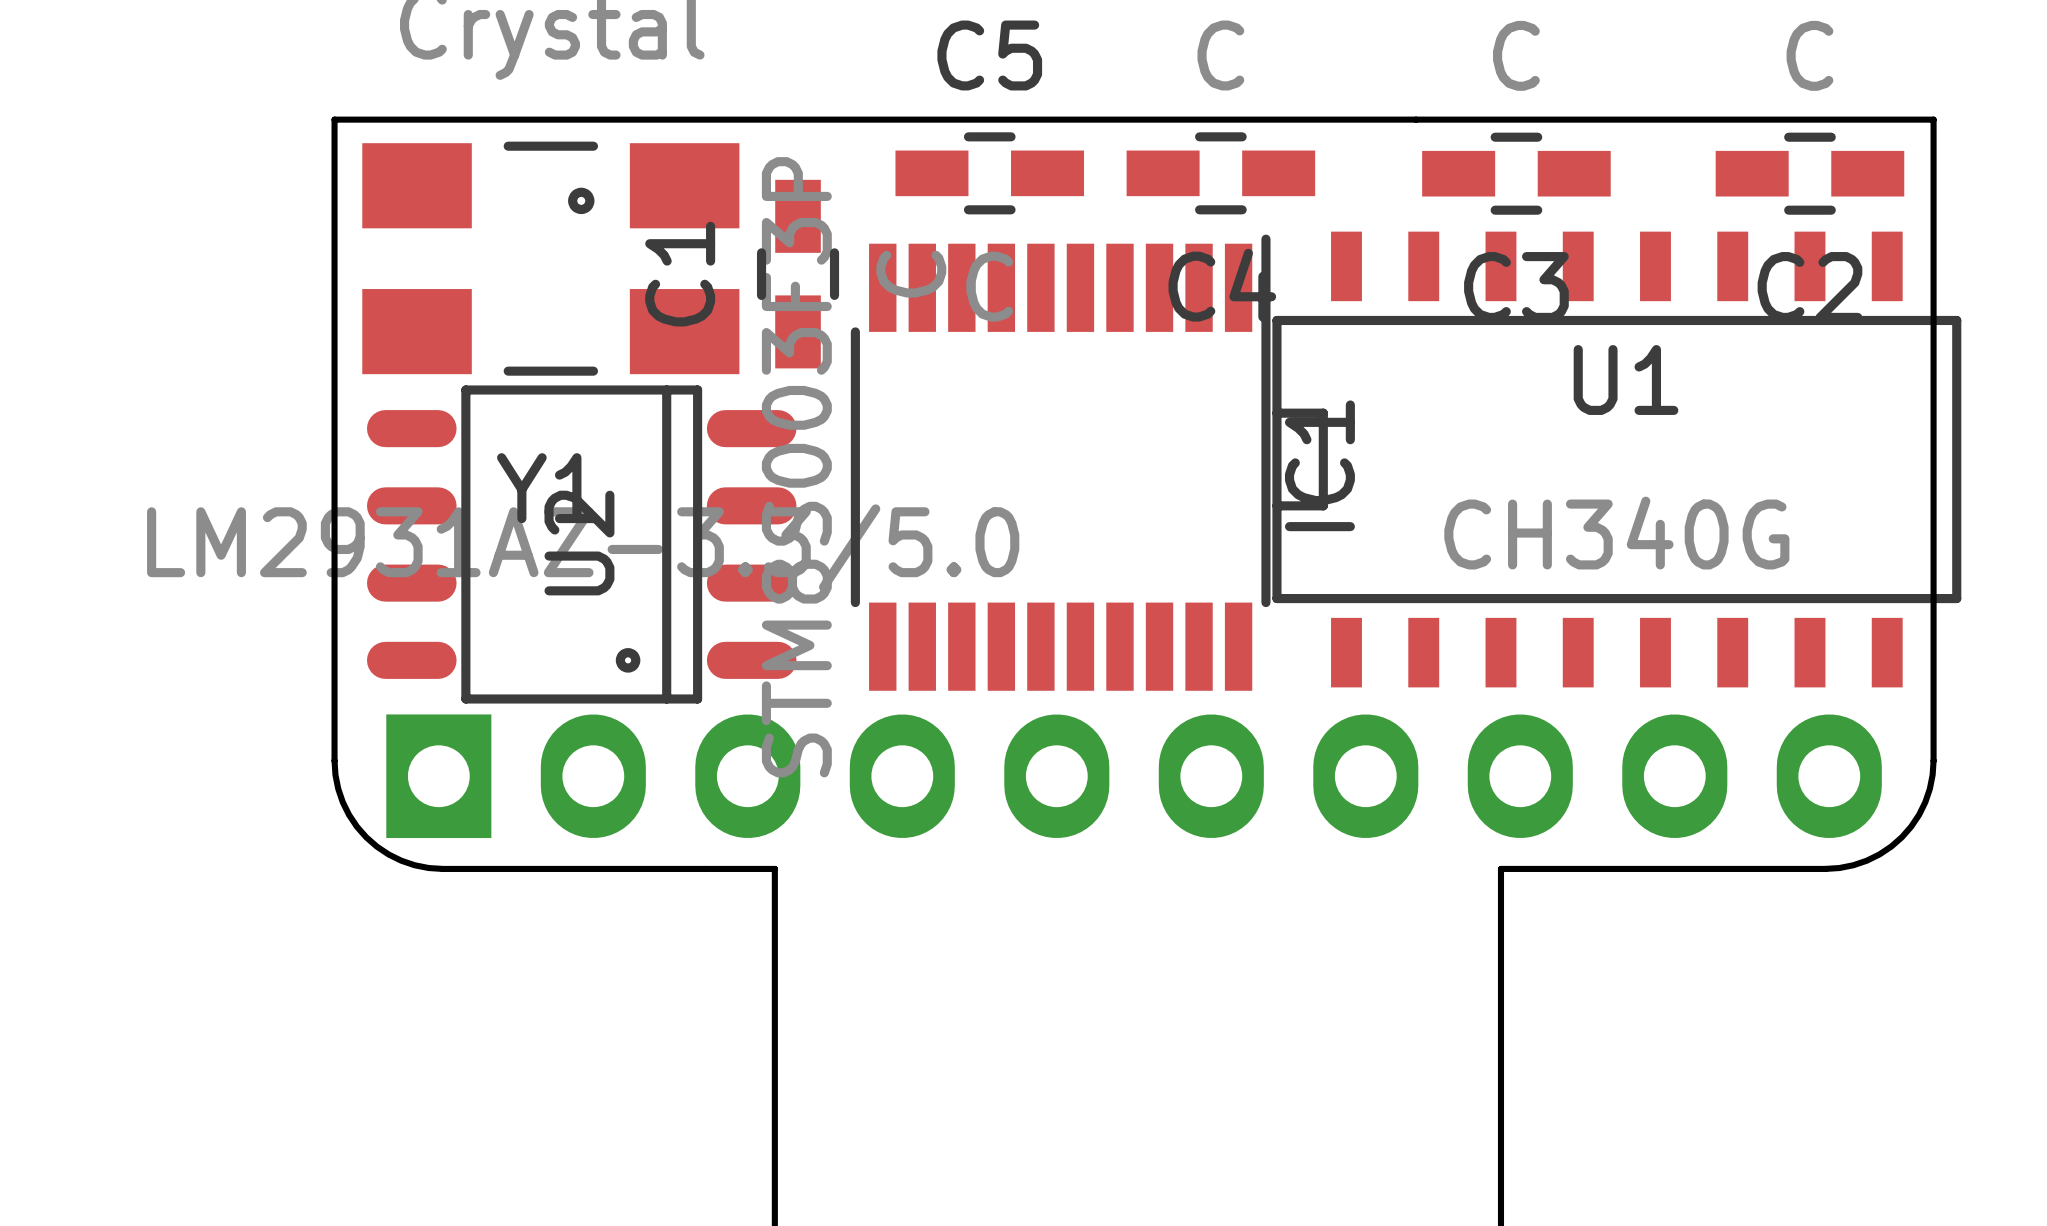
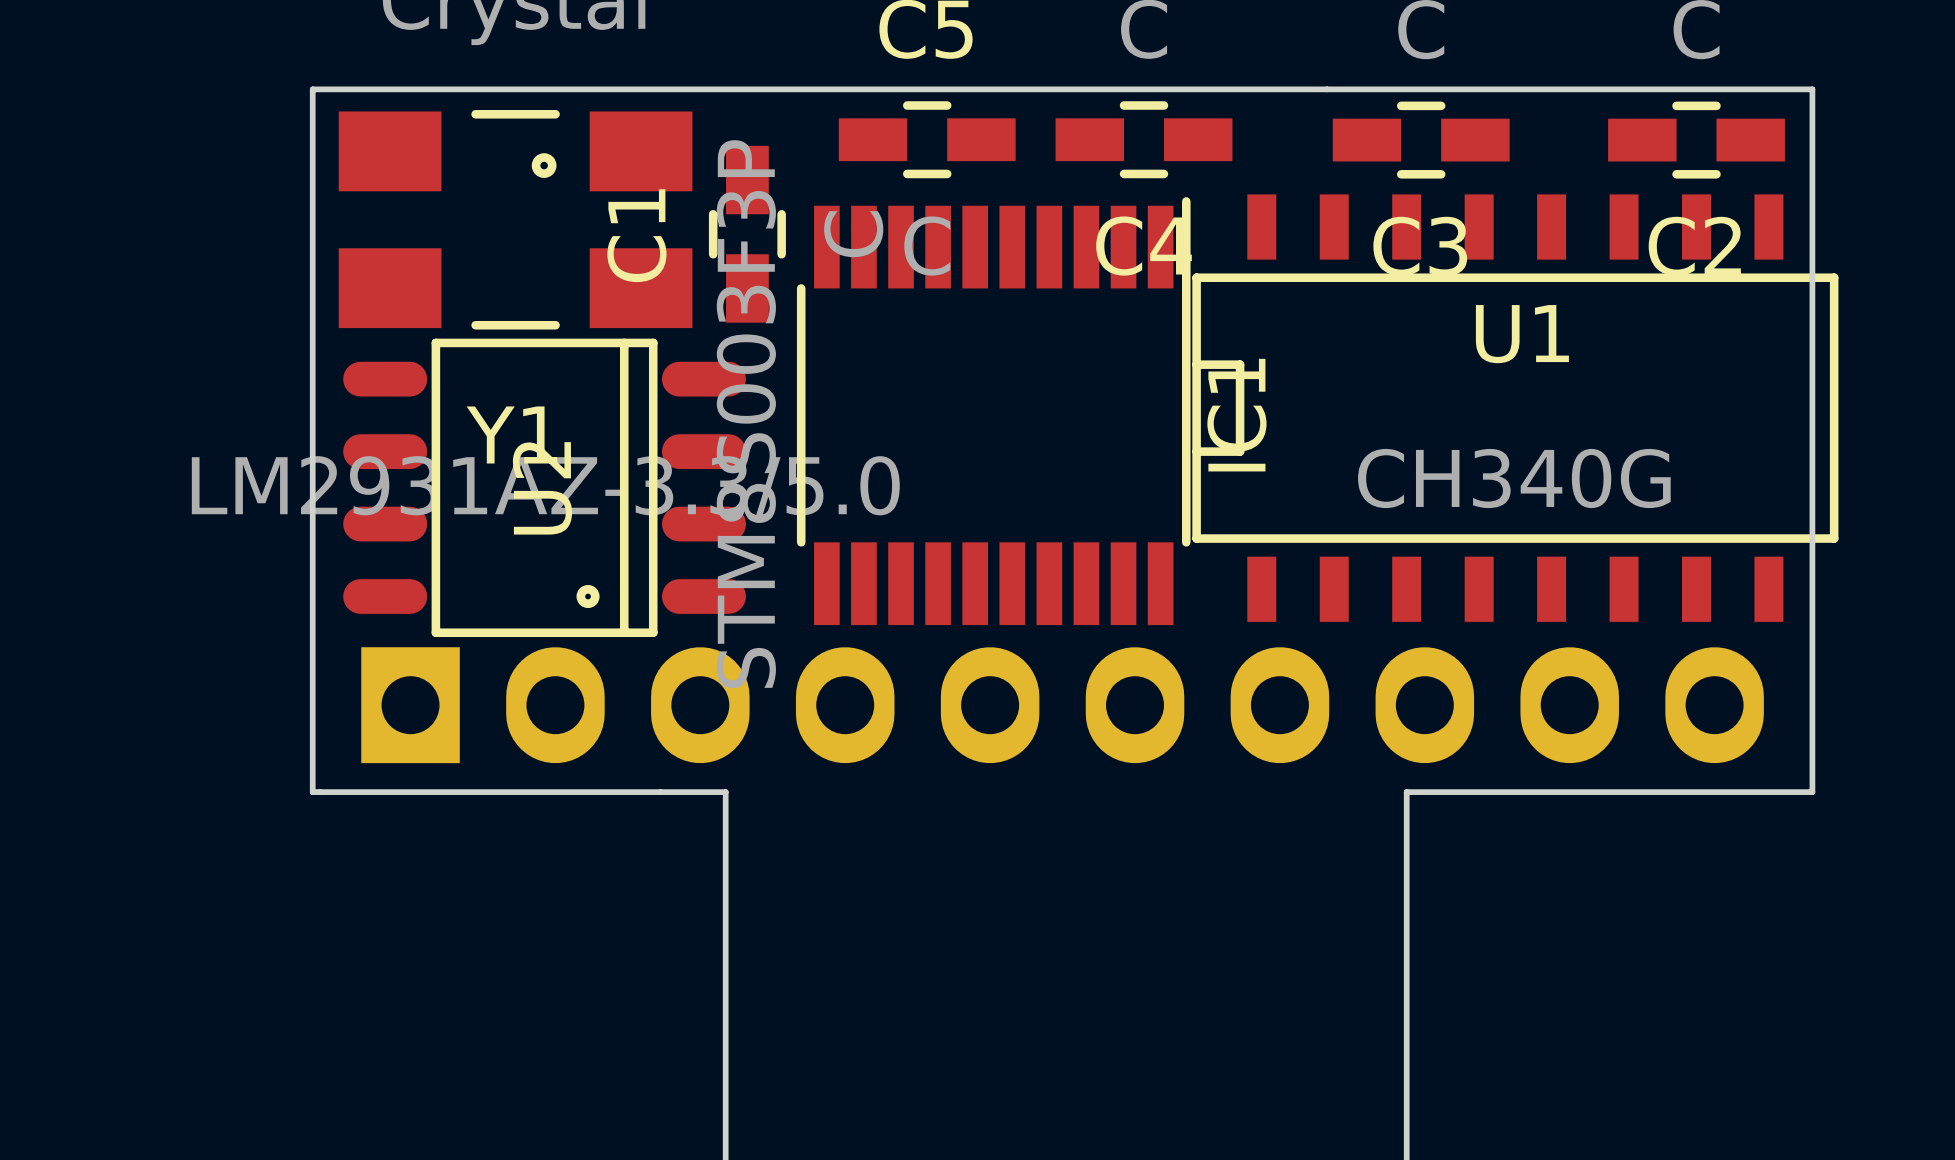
board edge: (334, 760) (335, 774) (342, 802) (349, 814) (366, 837) (388, 854) (401, 860) (414, 865) (442, 868) -> (312, 690) (312, 792) (414, 792)
board edge: (1933, 760) (1932, 774) (1925, 802) (1911, 826) (1901, 837) (1879, 854) (1866, 860) (1853, 865) (1825, 868) -> (1812, 690) (1812, 792) (1710, 792)

